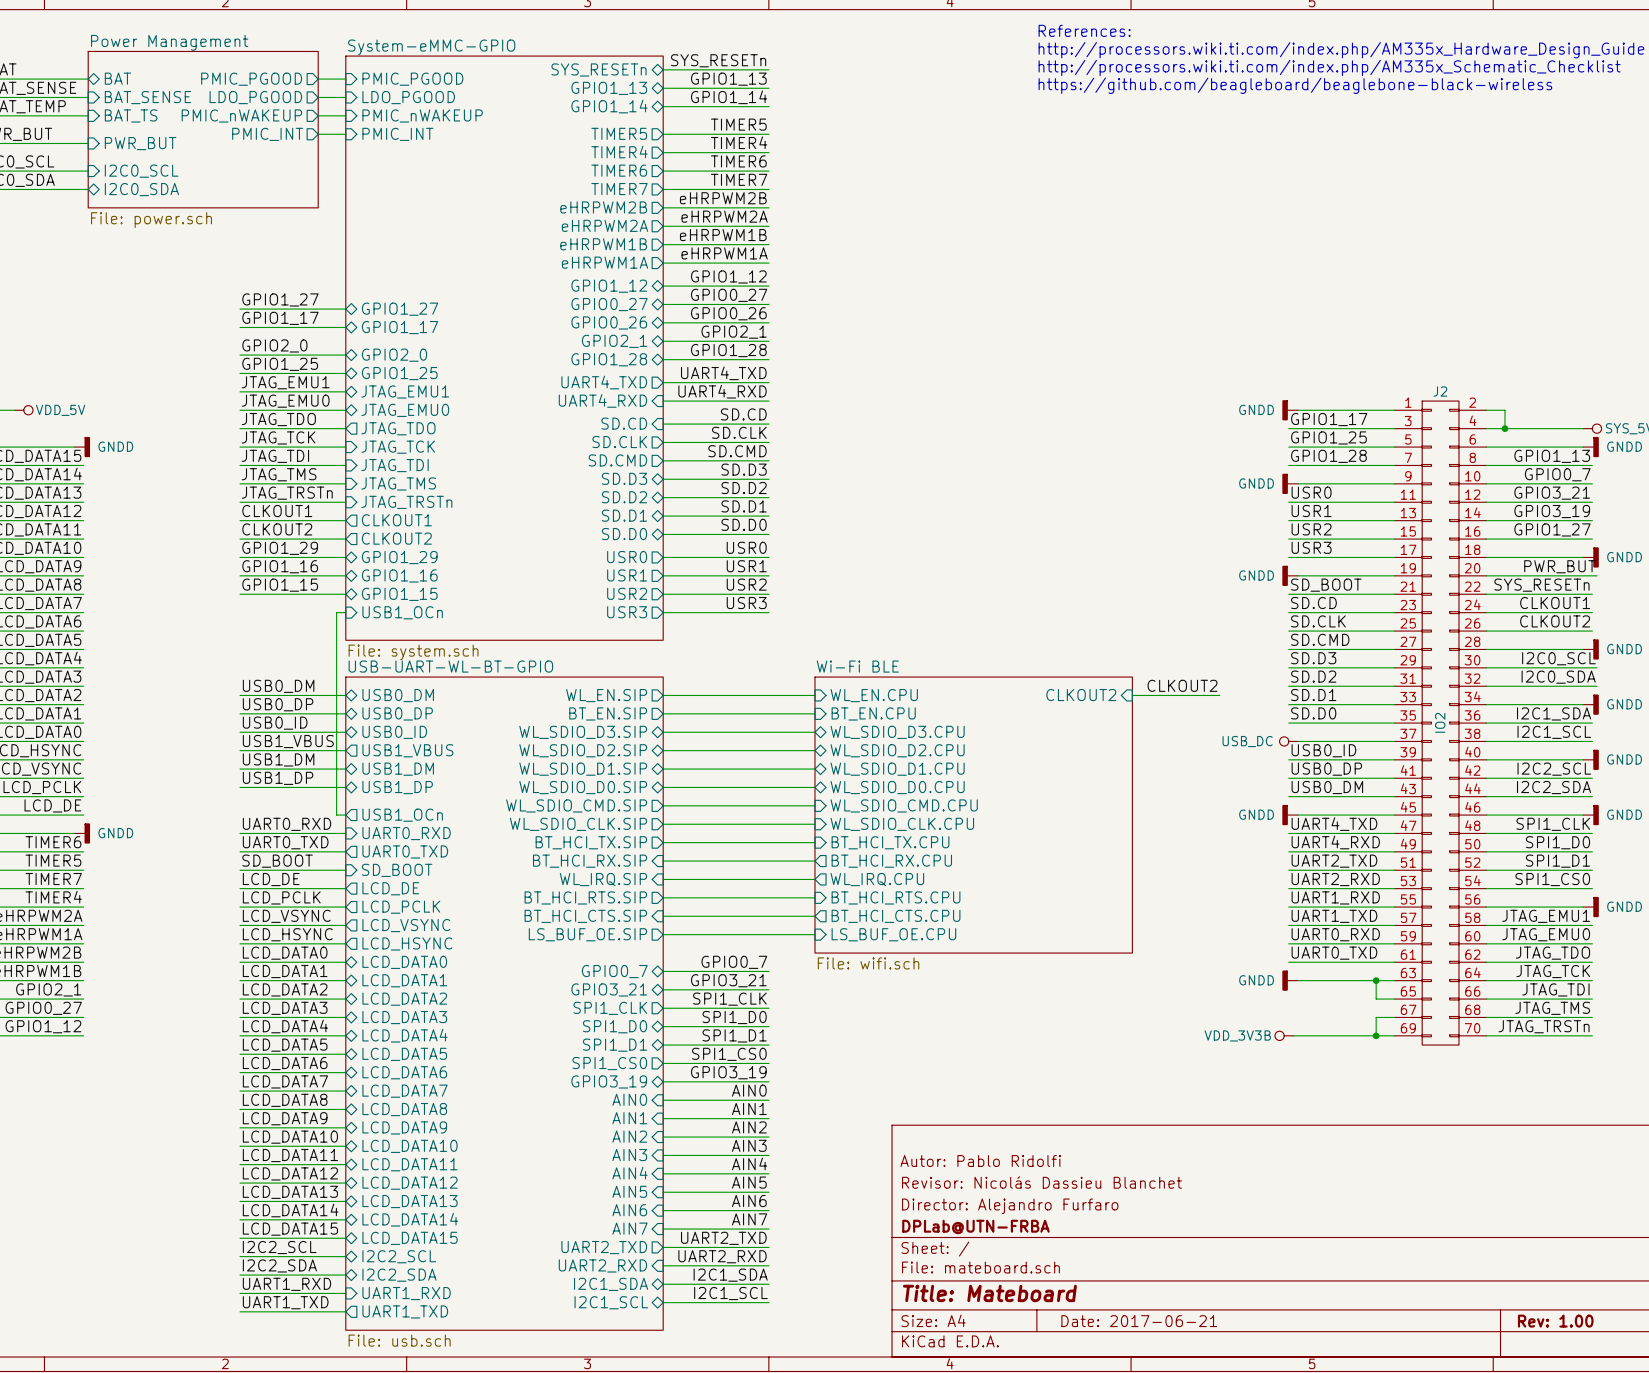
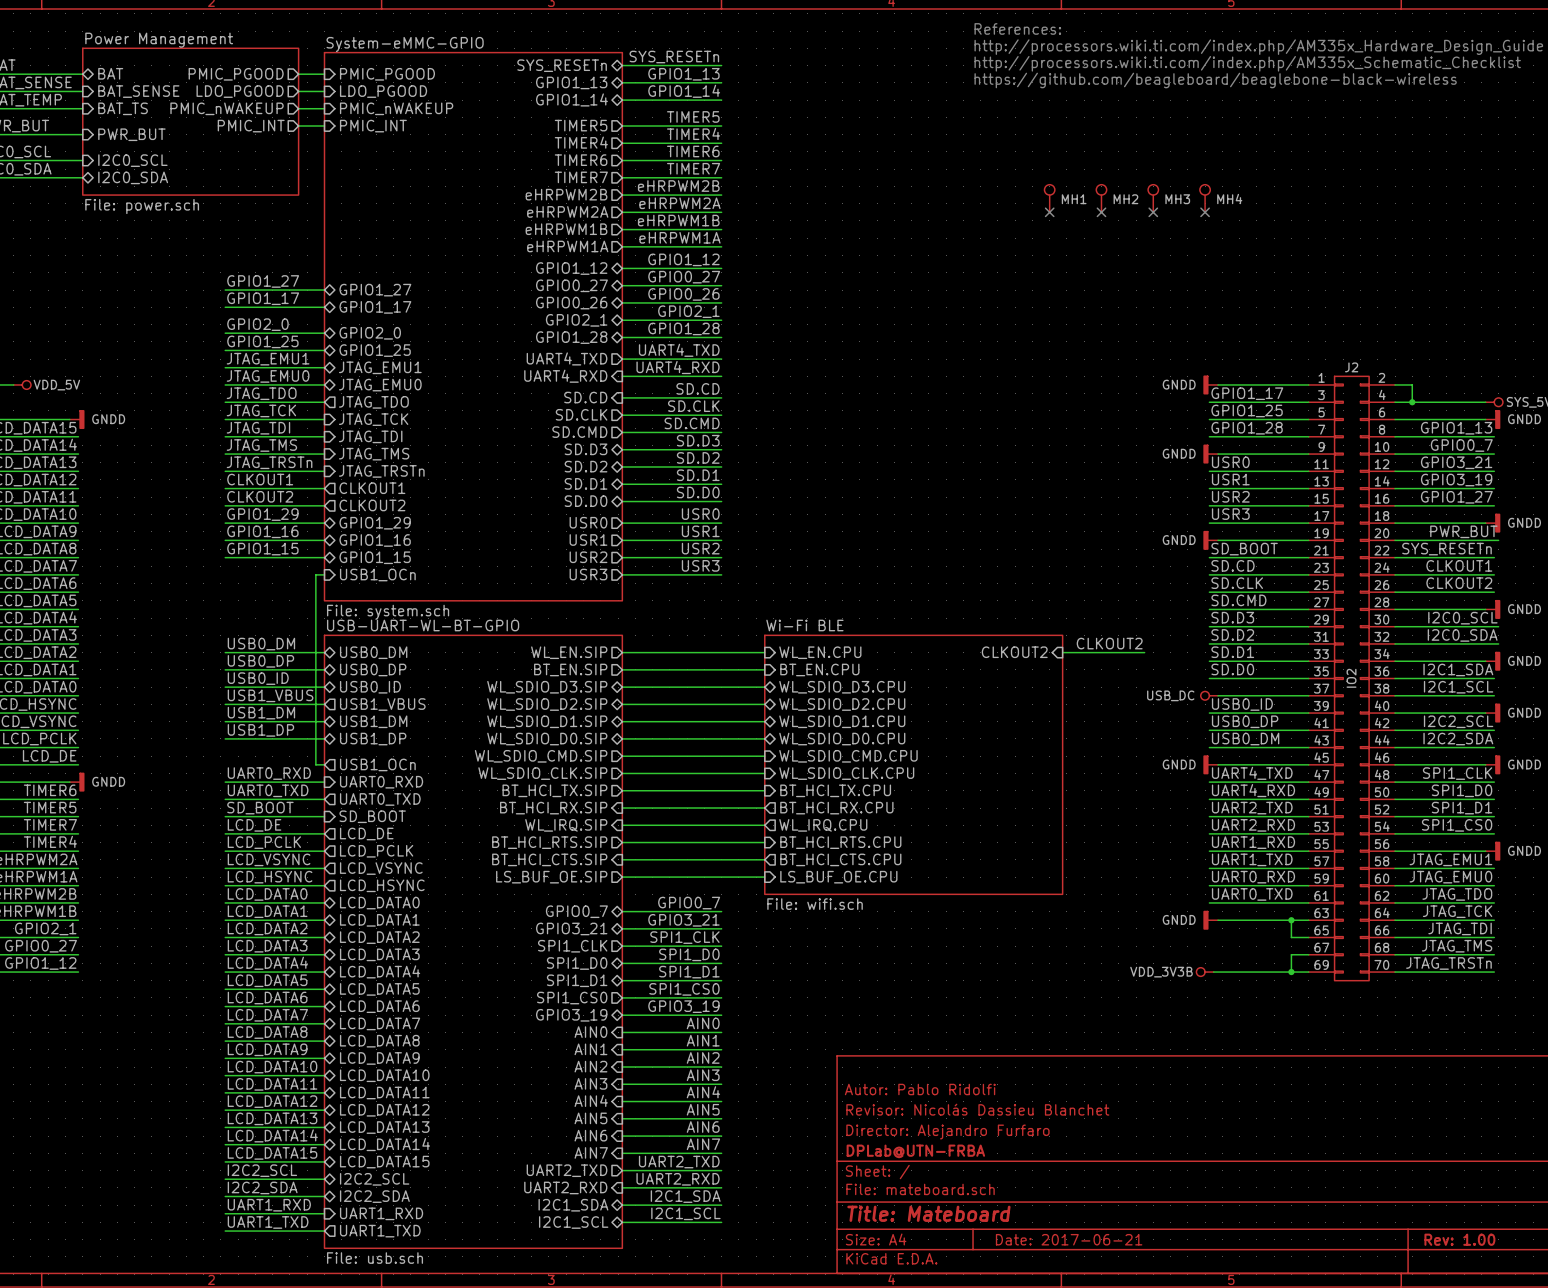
MH1: none -> (1049, 198)
MH2: none -> (1101, 198)
MH3: none -> (1153, 198)
MH4: none -> (1205, 198)
no-connect mark: none -> (1049, 212)
no-connect mark: none -> (1101, 212)
no-connect mark: none -> (1153, 212)
no-connect mark: none -> (1205, 212)

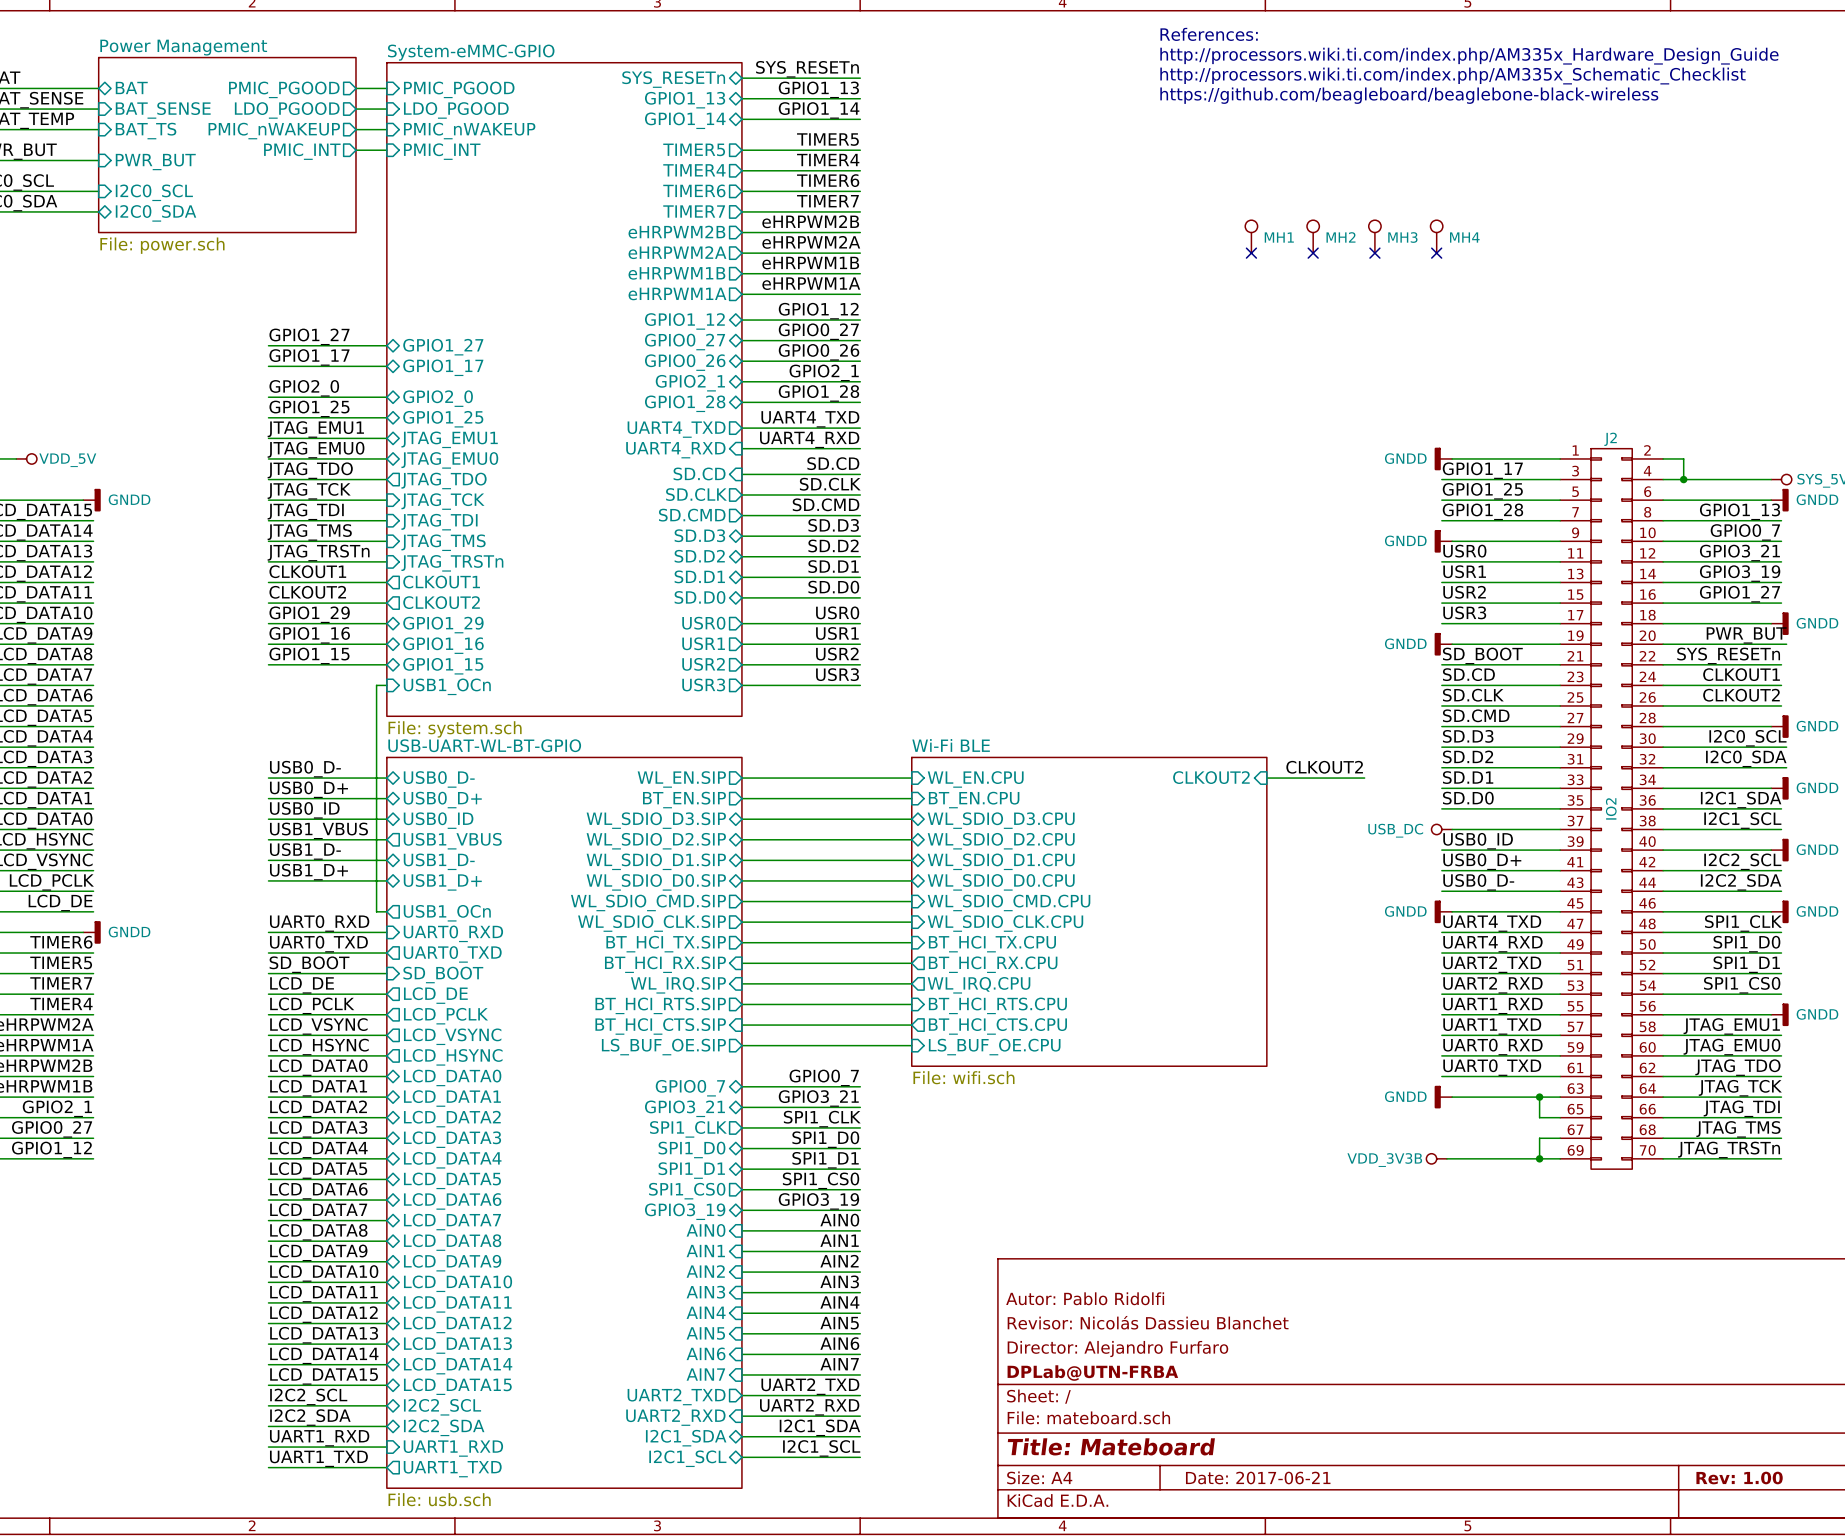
label: USB0_DM (261, 644) -> USB0_D- (305, 769)
sheet pin: USB0_DM (373, 652) -> USB0_D- (439, 779)
label: USB0_DP (260, 661) -> USB0_D+ (308, 789)
sheet pin: USB0_DP (373, 669) -> USB0_D+ (442, 800)
label: USB1_DM (261, 713) -> USB1_D- (305, 851)
sheet pin: USB1_DM (373, 721) -> USB1_D- (439, 861)
label: USB0_DP (1245, 721) -> USB0_D+ (1482, 861)
label: USB1_DP (260, 730) -> USB1_D+ (308, 872)
sheet pin: USB1_DP (373, 739) -> USB1_D+ (442, 882)
label: USB0_DM (1245, 739) -> USB0_D- (1478, 882)

